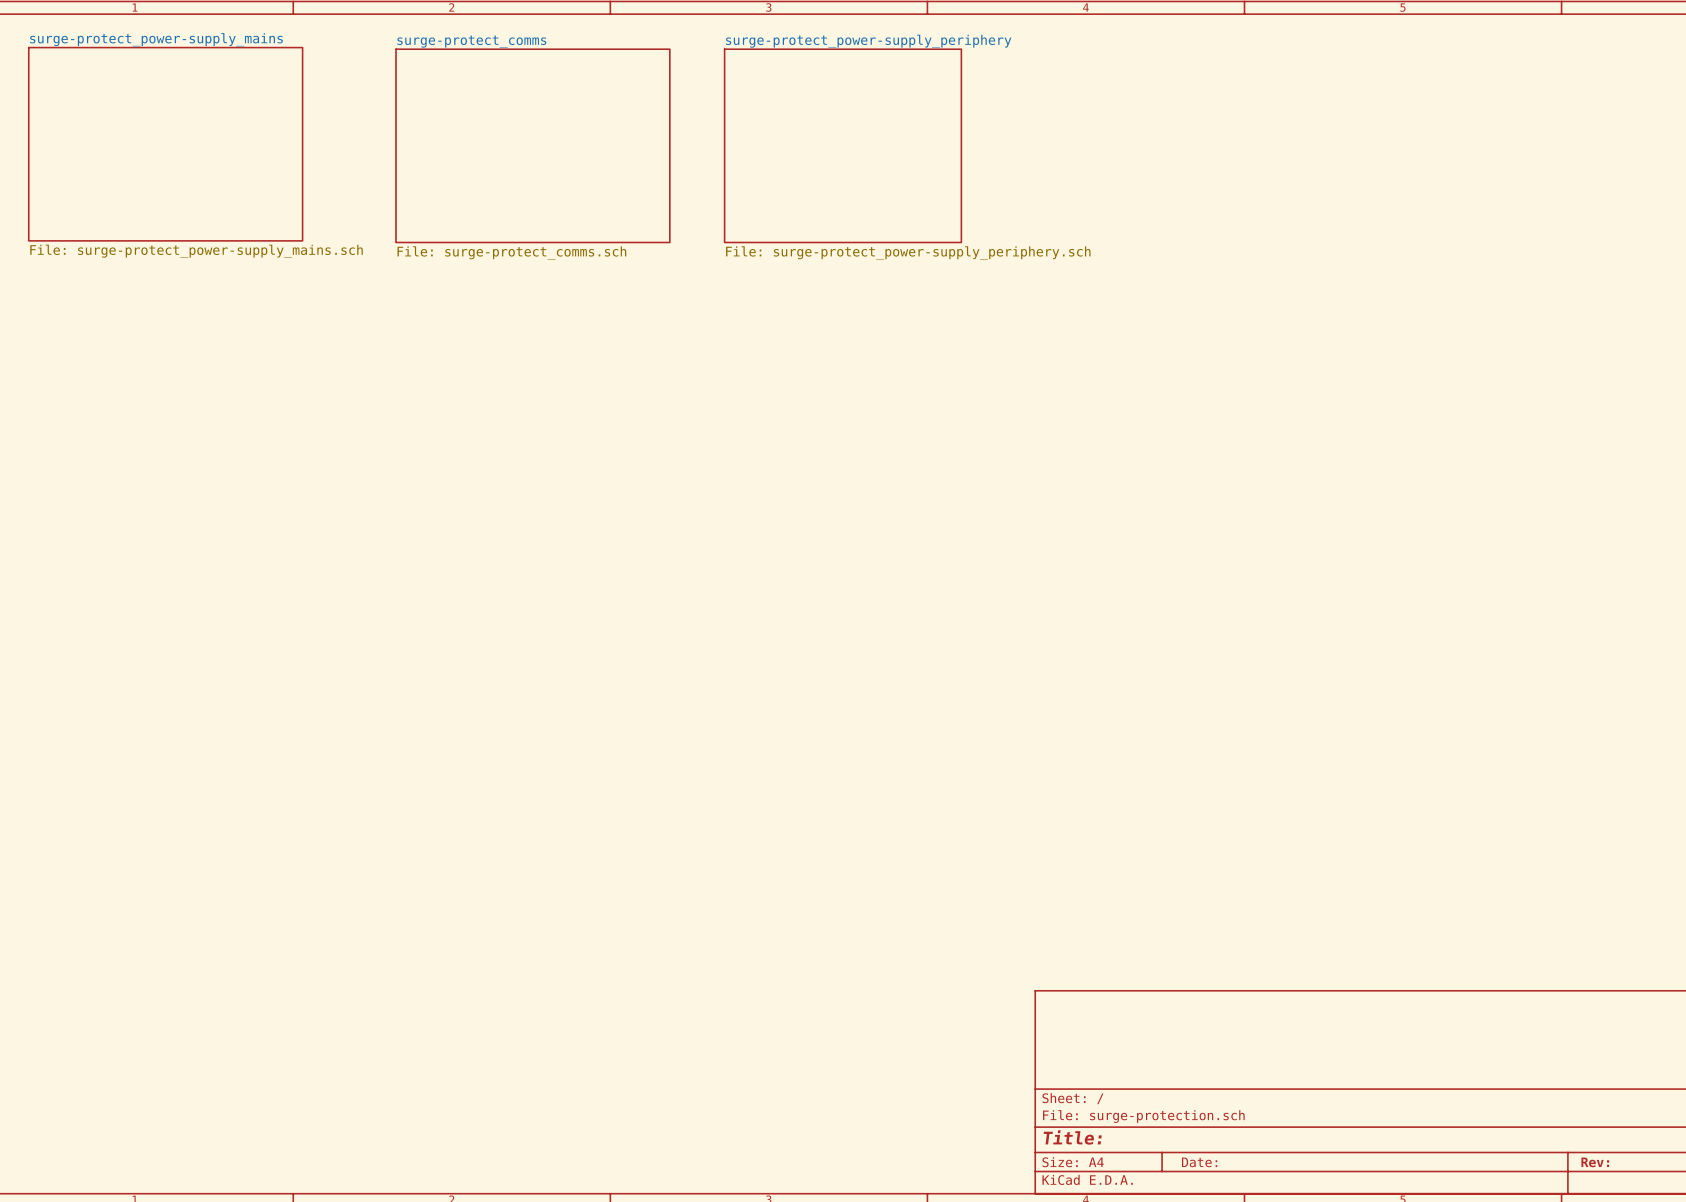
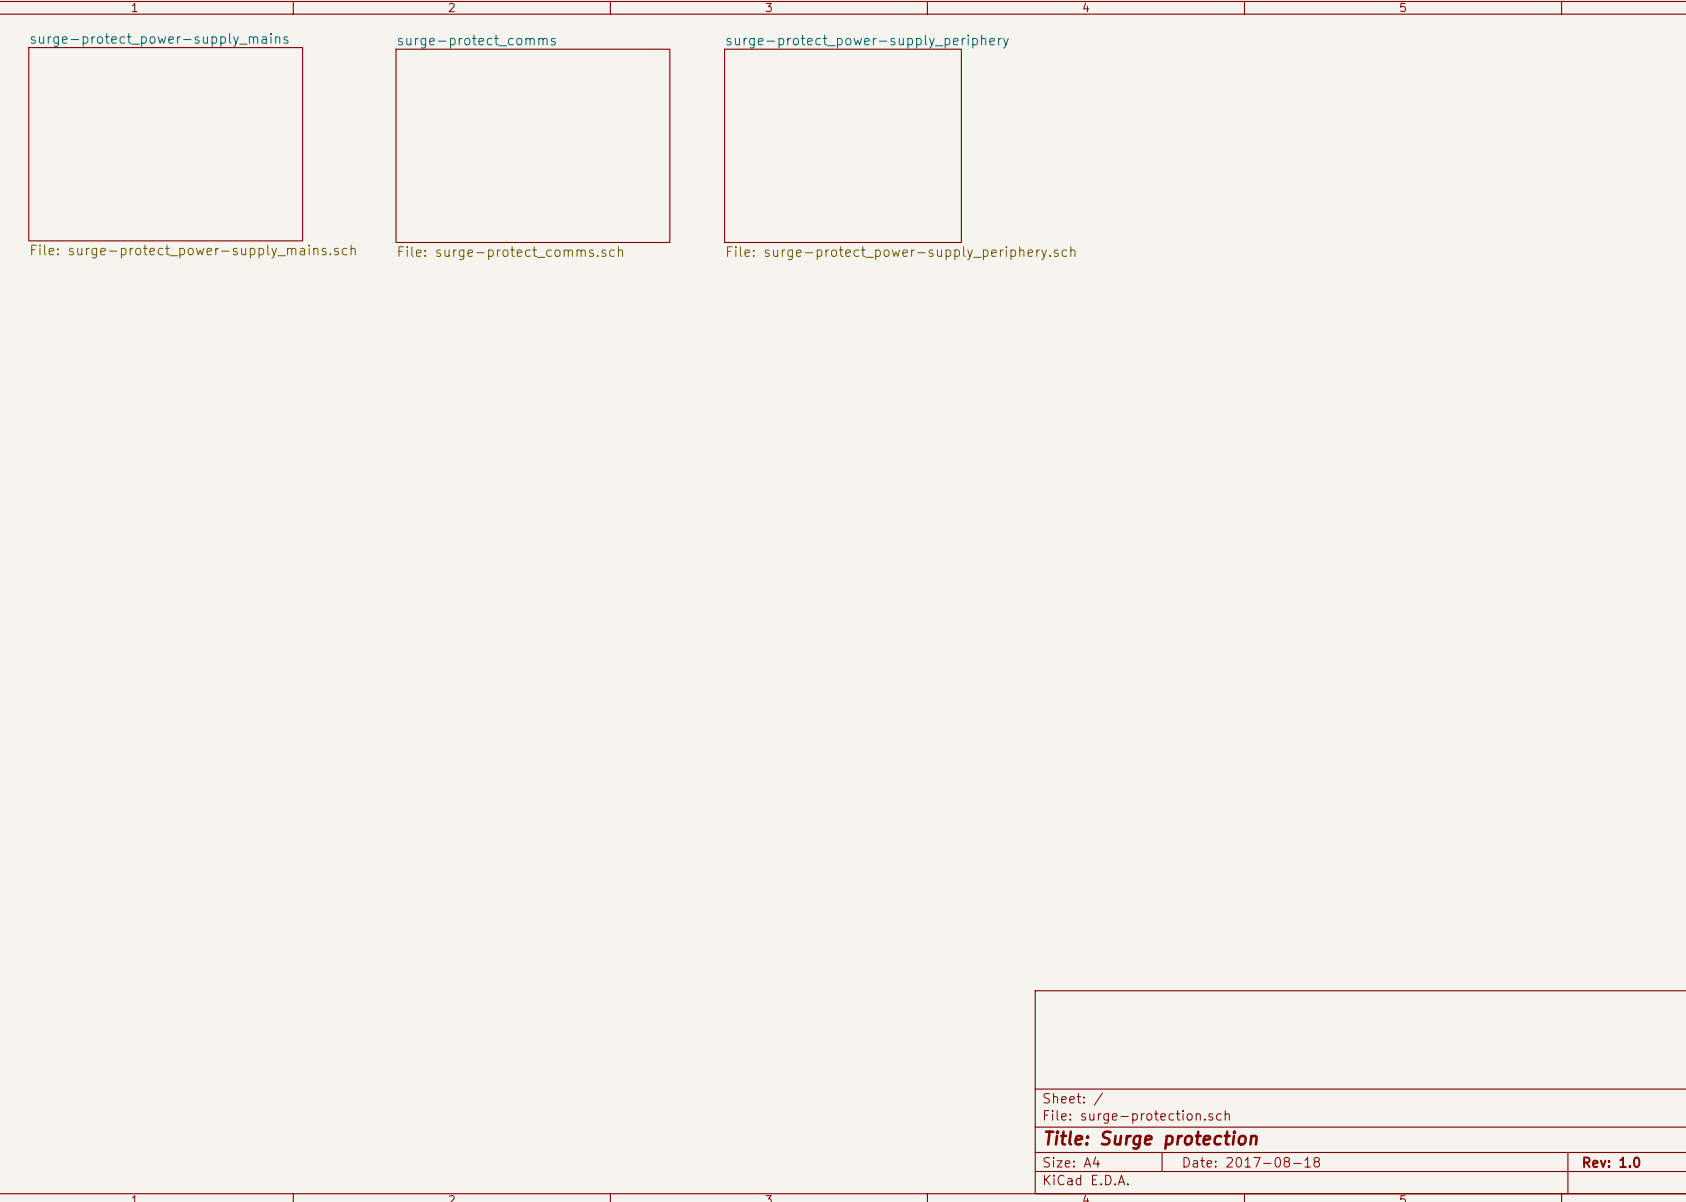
title block: Title: (1072, 1137) -> Title: Surge protection (1151, 1140)
title block: Date: (1199, 1162) -> Date: 2017-08-18 (1251, 1162)
title block: Rev: (1595, 1162) -> Rev: 1.0 (1611, 1162)

